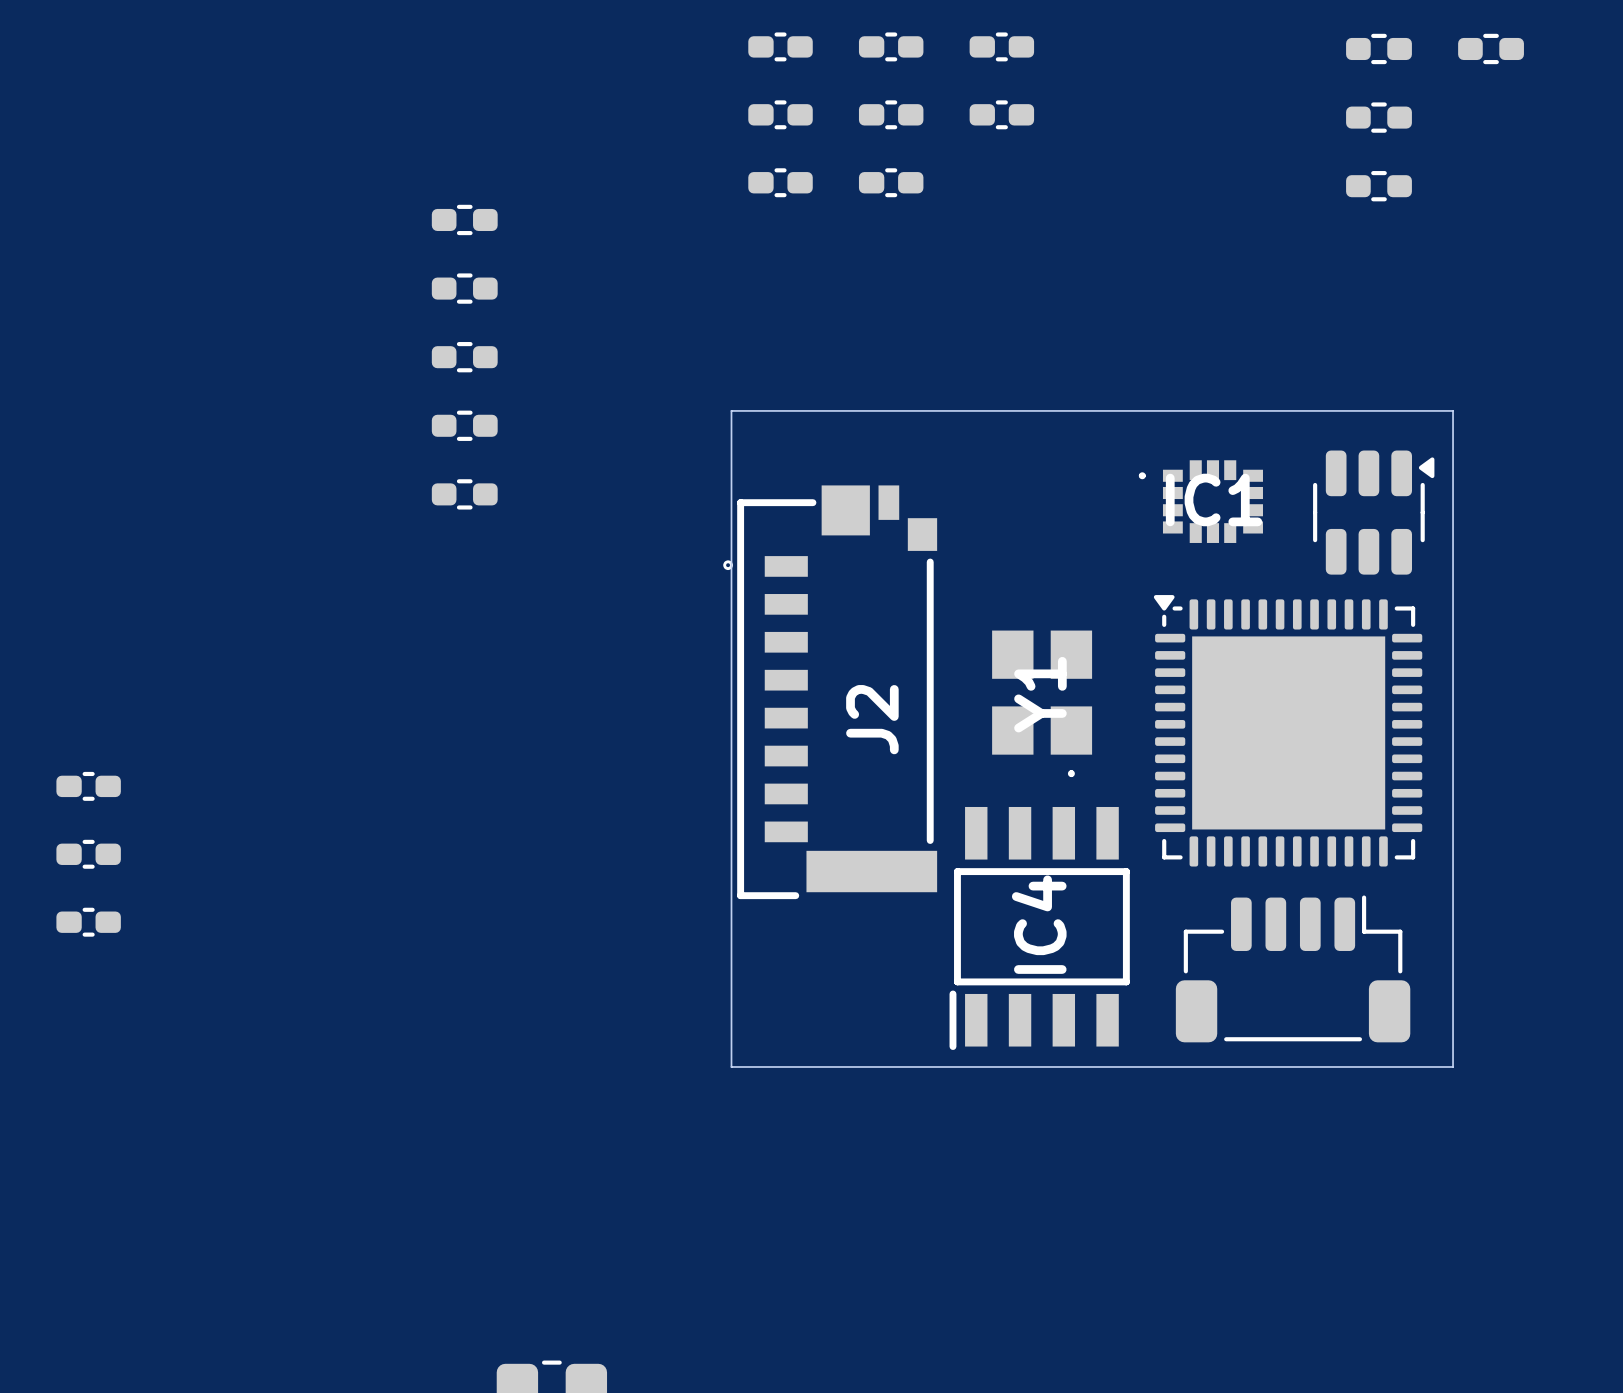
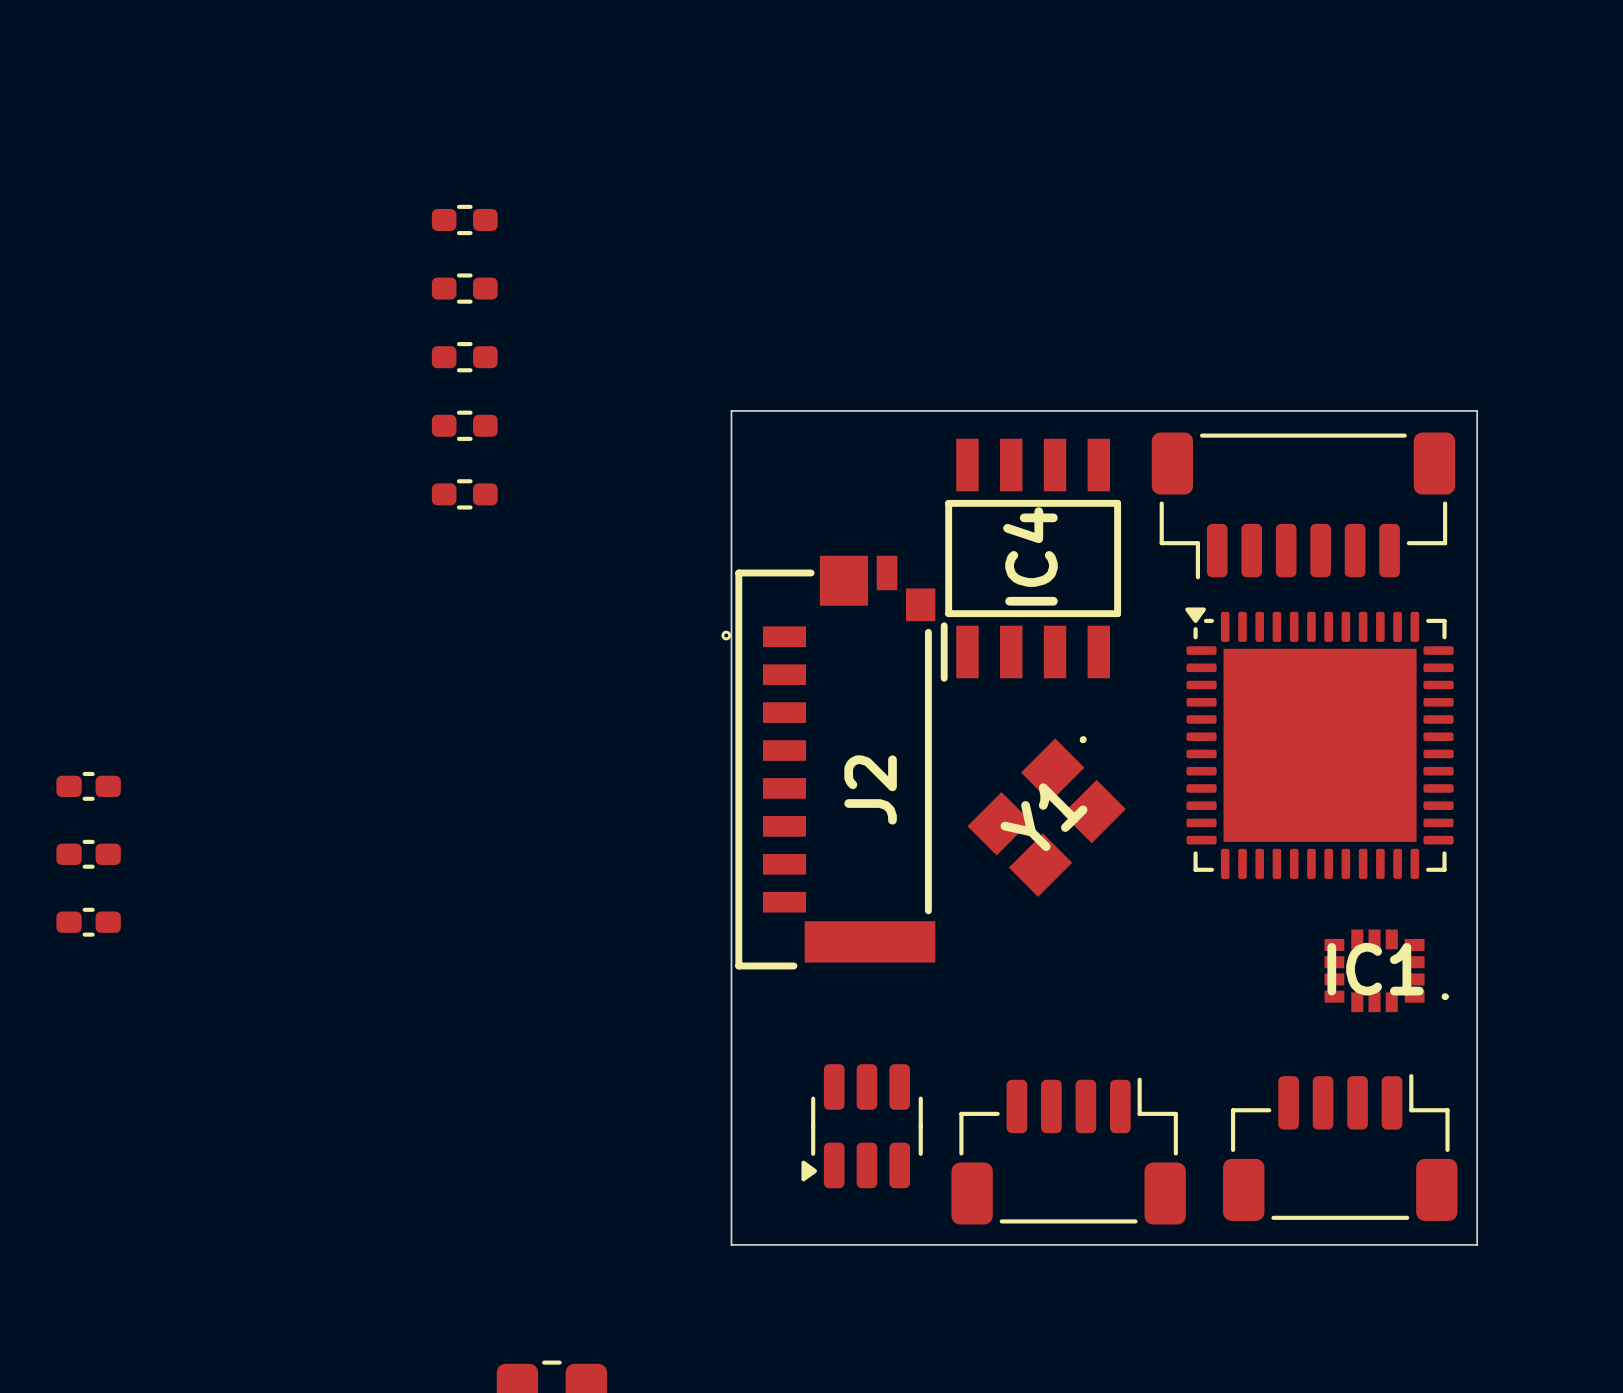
part: (780, 46) -> none
part: (891, 46) -> none
part: (1001, 46) -> none
part: (1378, 48) -> none
part: (1491, 48) -> none
part: (780, 114) -> none
part: (891, 114) -> none
part: (1001, 114) -> none
part: (1378, 117) -> none
part: (780, 182) -> none
part: (891, 182) -> none
part: (1378, 186) -> none
board edge: (1453, 410) (1453, 1066) (731, 1066) -> (1453, 410) (1477, 410) (1477, 1244) (731, 1244) (731, 1066)
IC1 rotation: 0° (1200, 501) -> 180° (1386, 970)
IC1 position: (1200, 501) -> (1386, 970)
part: none -> (1303, 505)
part rotation: 0° (1373, 512) -> 180° (862, 1126)
part position: (1373, 512) -> (862, 1126)
J2 position: (830, 692) -> (828, 762)
Y1 rotation: 0° (1042, 703) -> 135° counterclockwise (1046, 816)
Y1 position: (1042, 703) -> (1046, 816)
part position: (1288, 730) -> (1319, 743)
IC4 position: (1039, 928) -> (1030, 560)
part: (1293, 968) -> none
part: none -> (1340, 1147)
part: none -> (1068, 1151)

